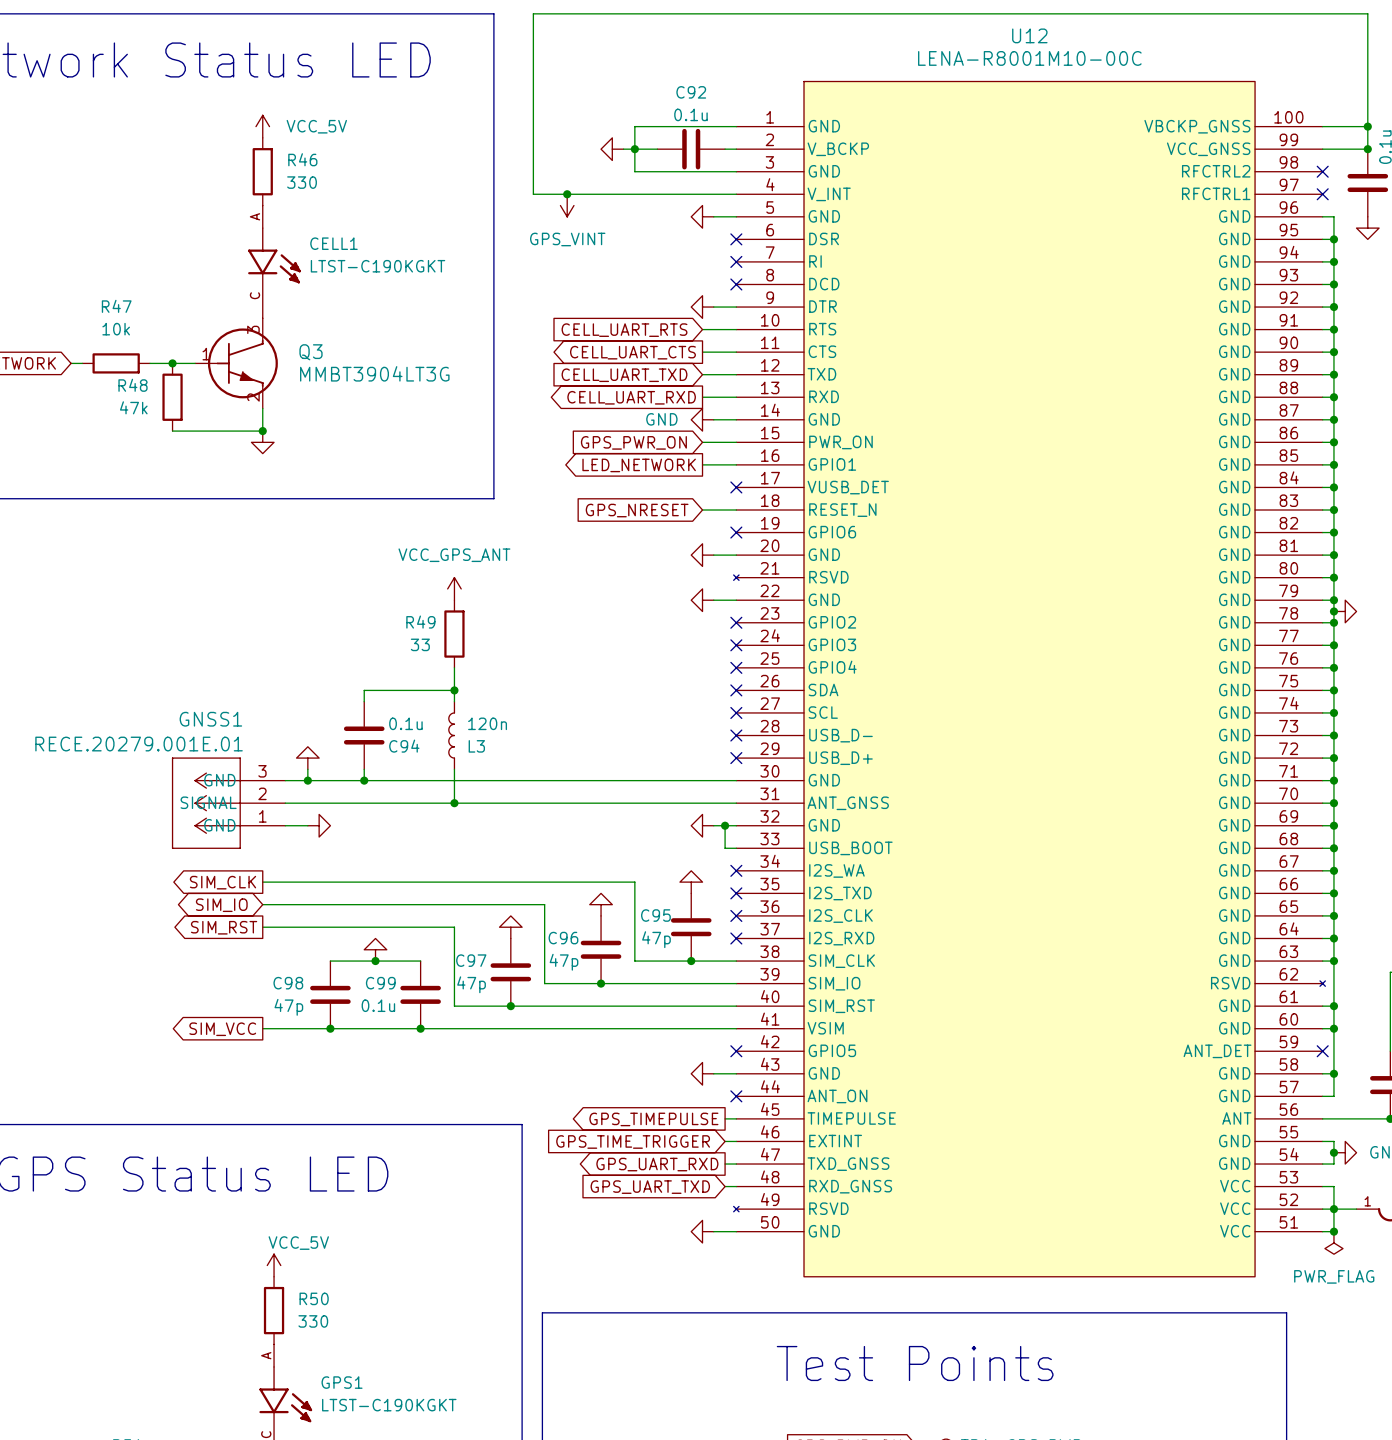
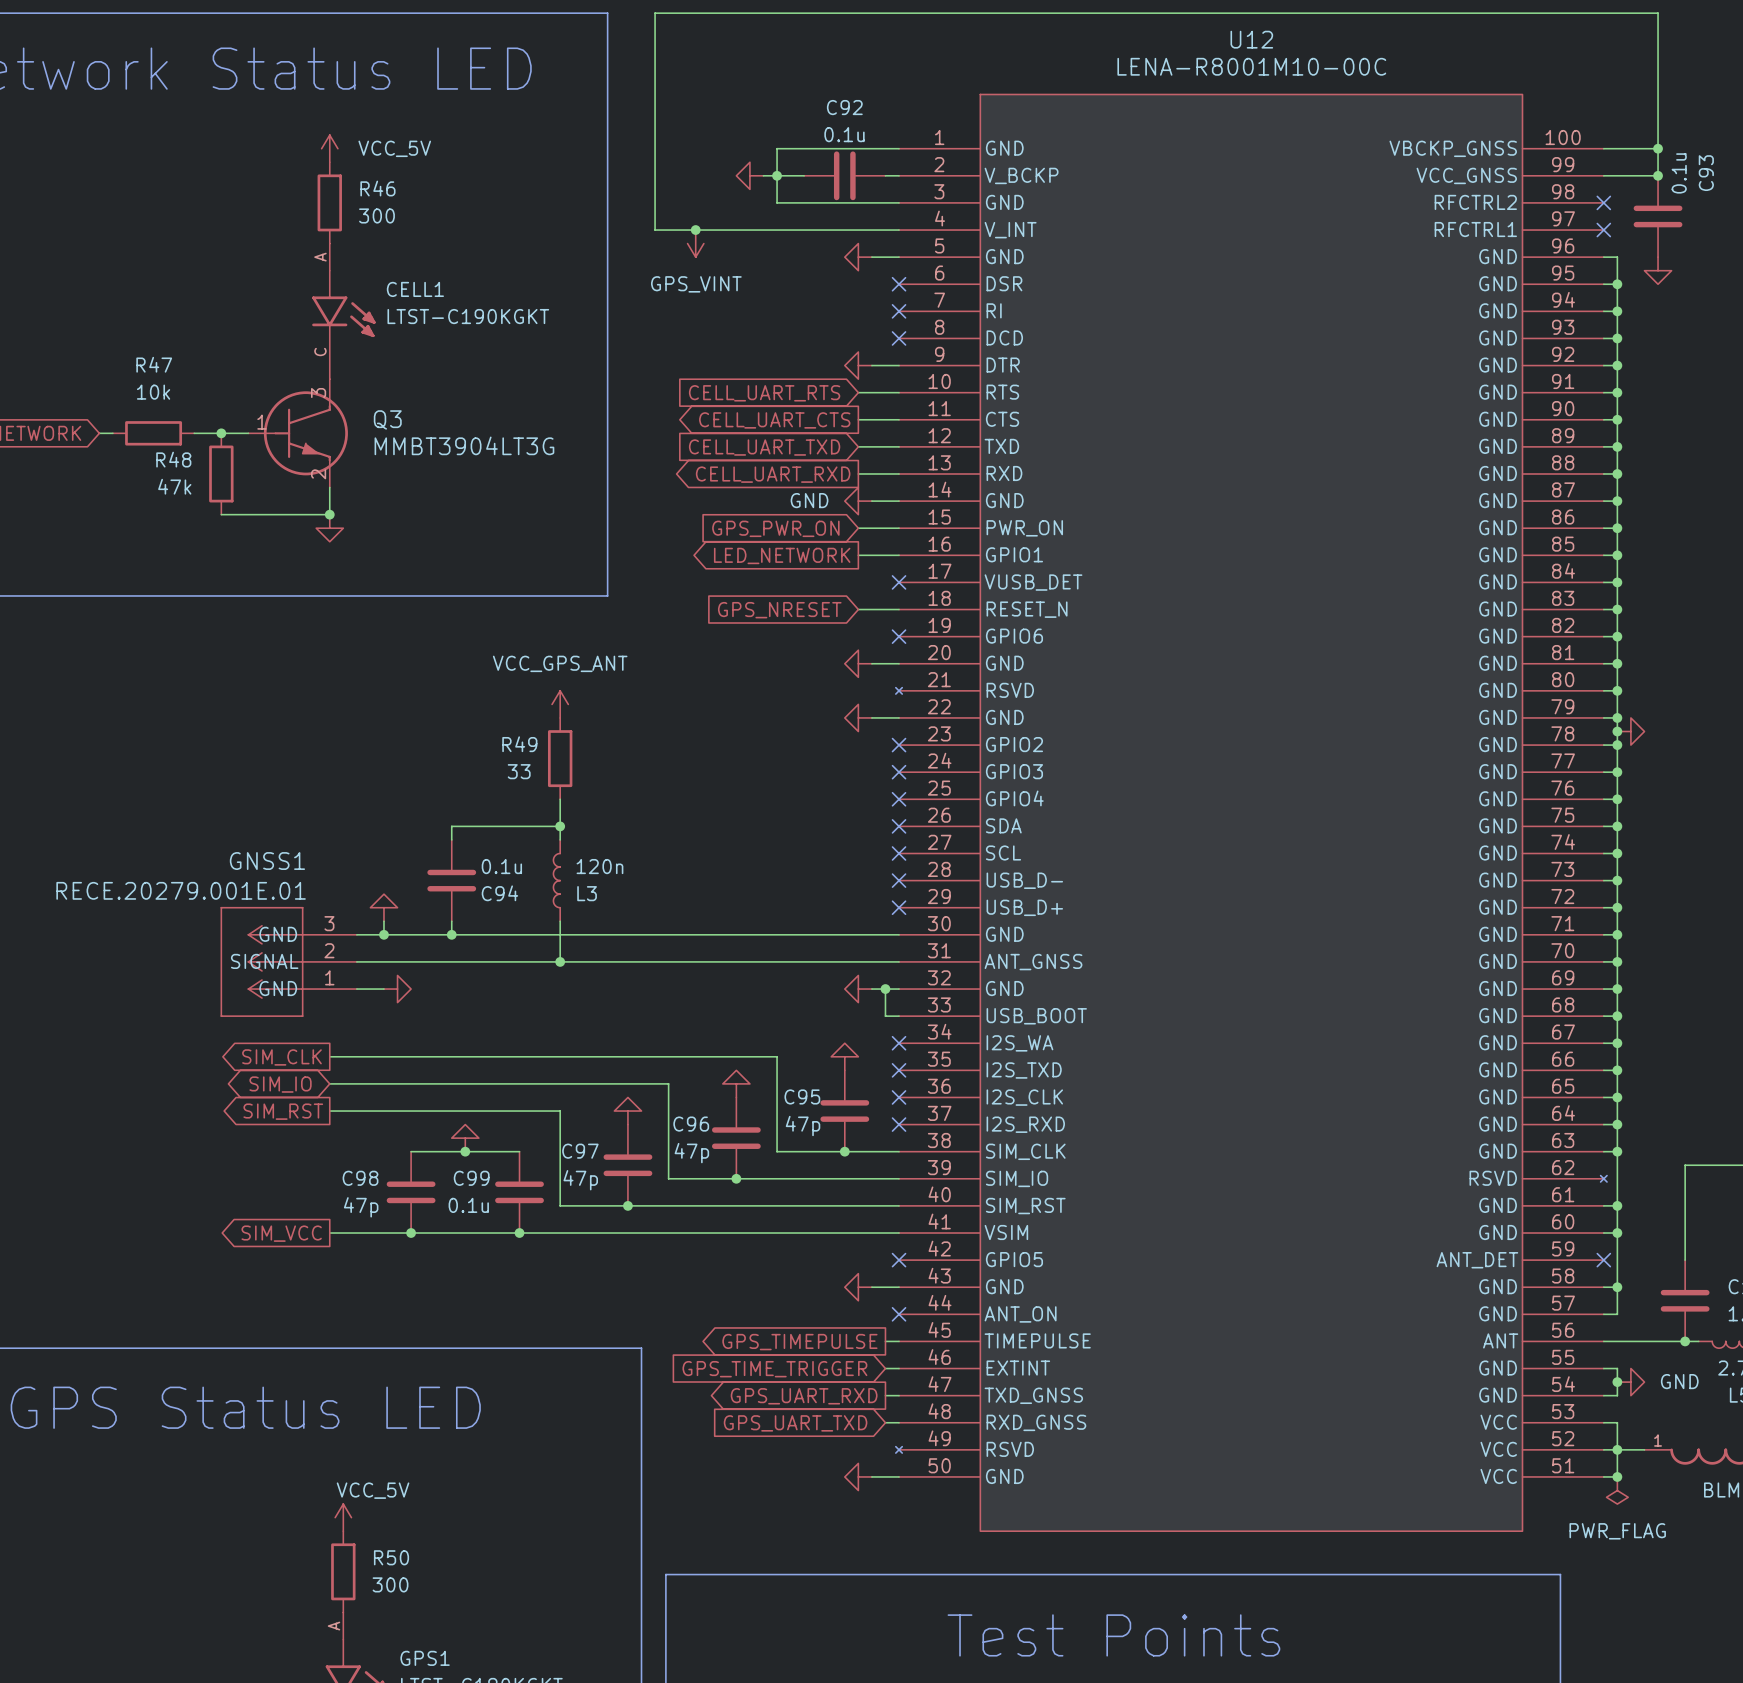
R46 value: 330 (302, 182) -> 300 (376, 215)
R50 value: 330 (313, 1321) -> 300 (390, 1584)

